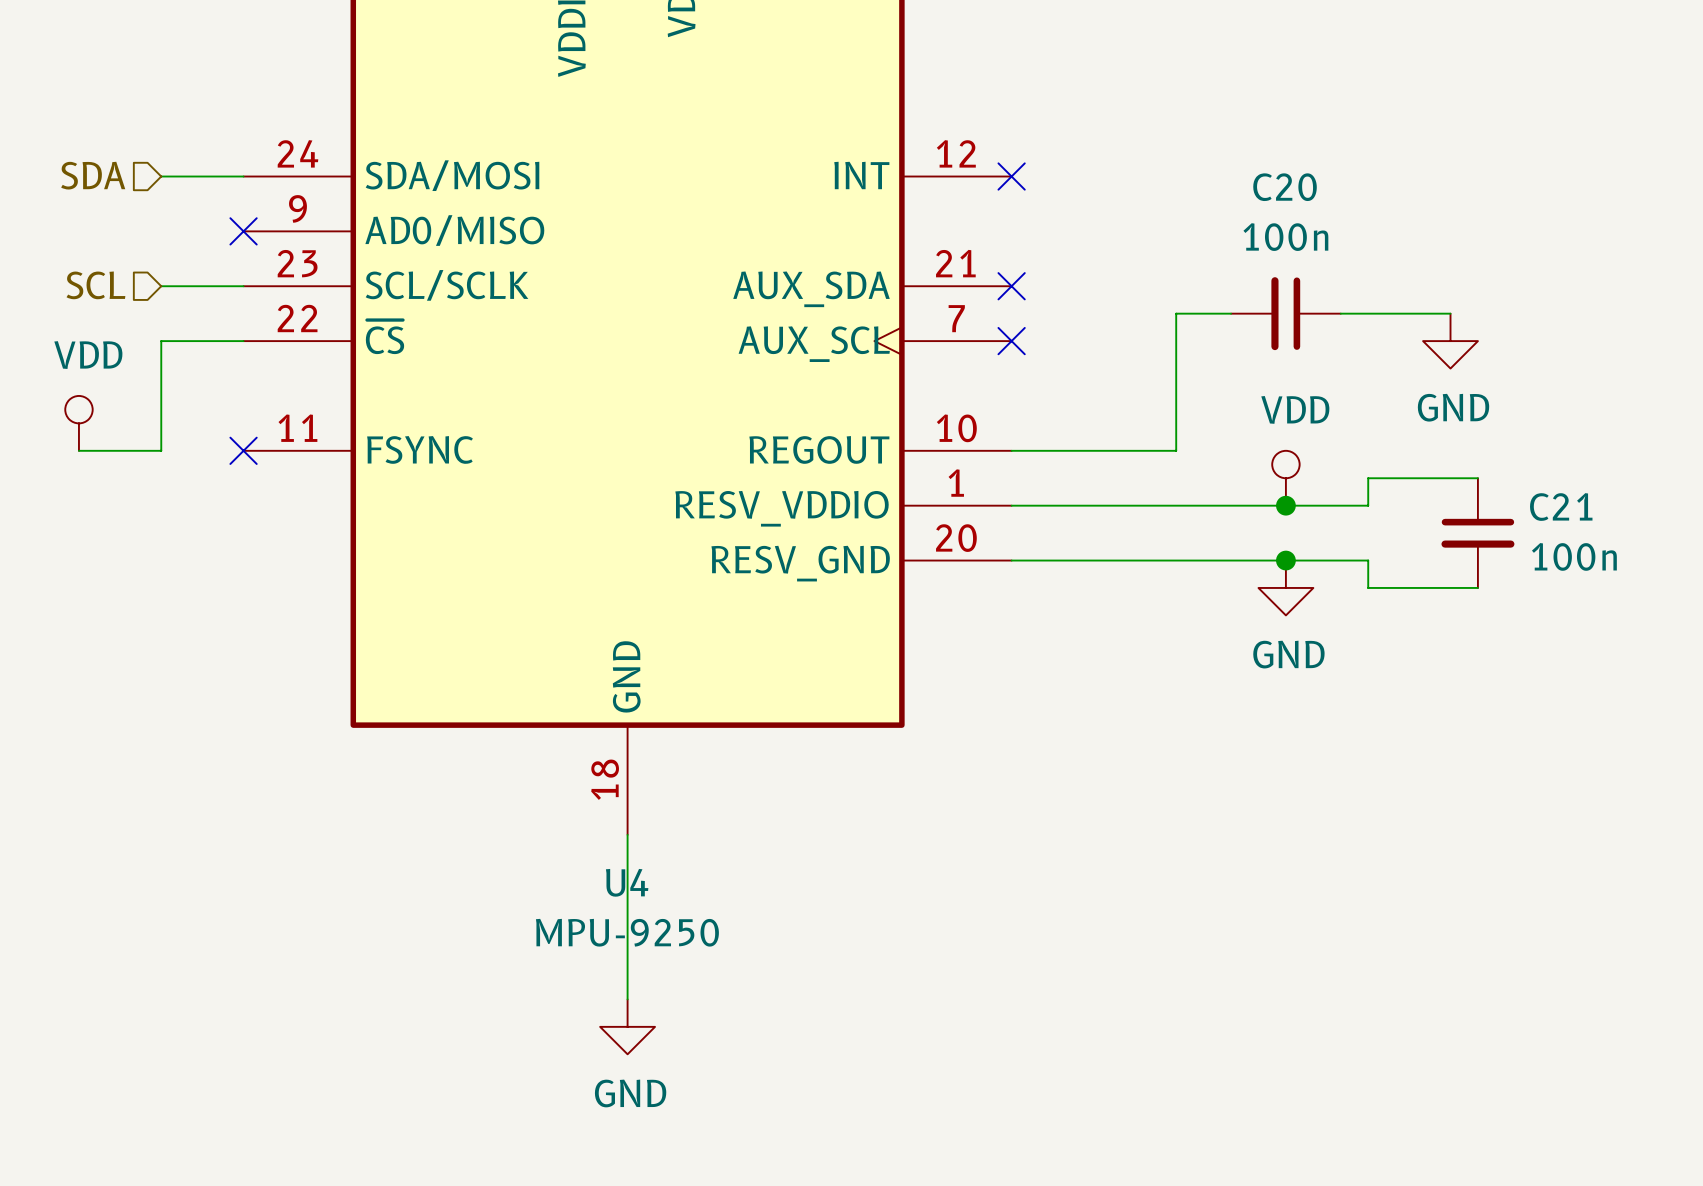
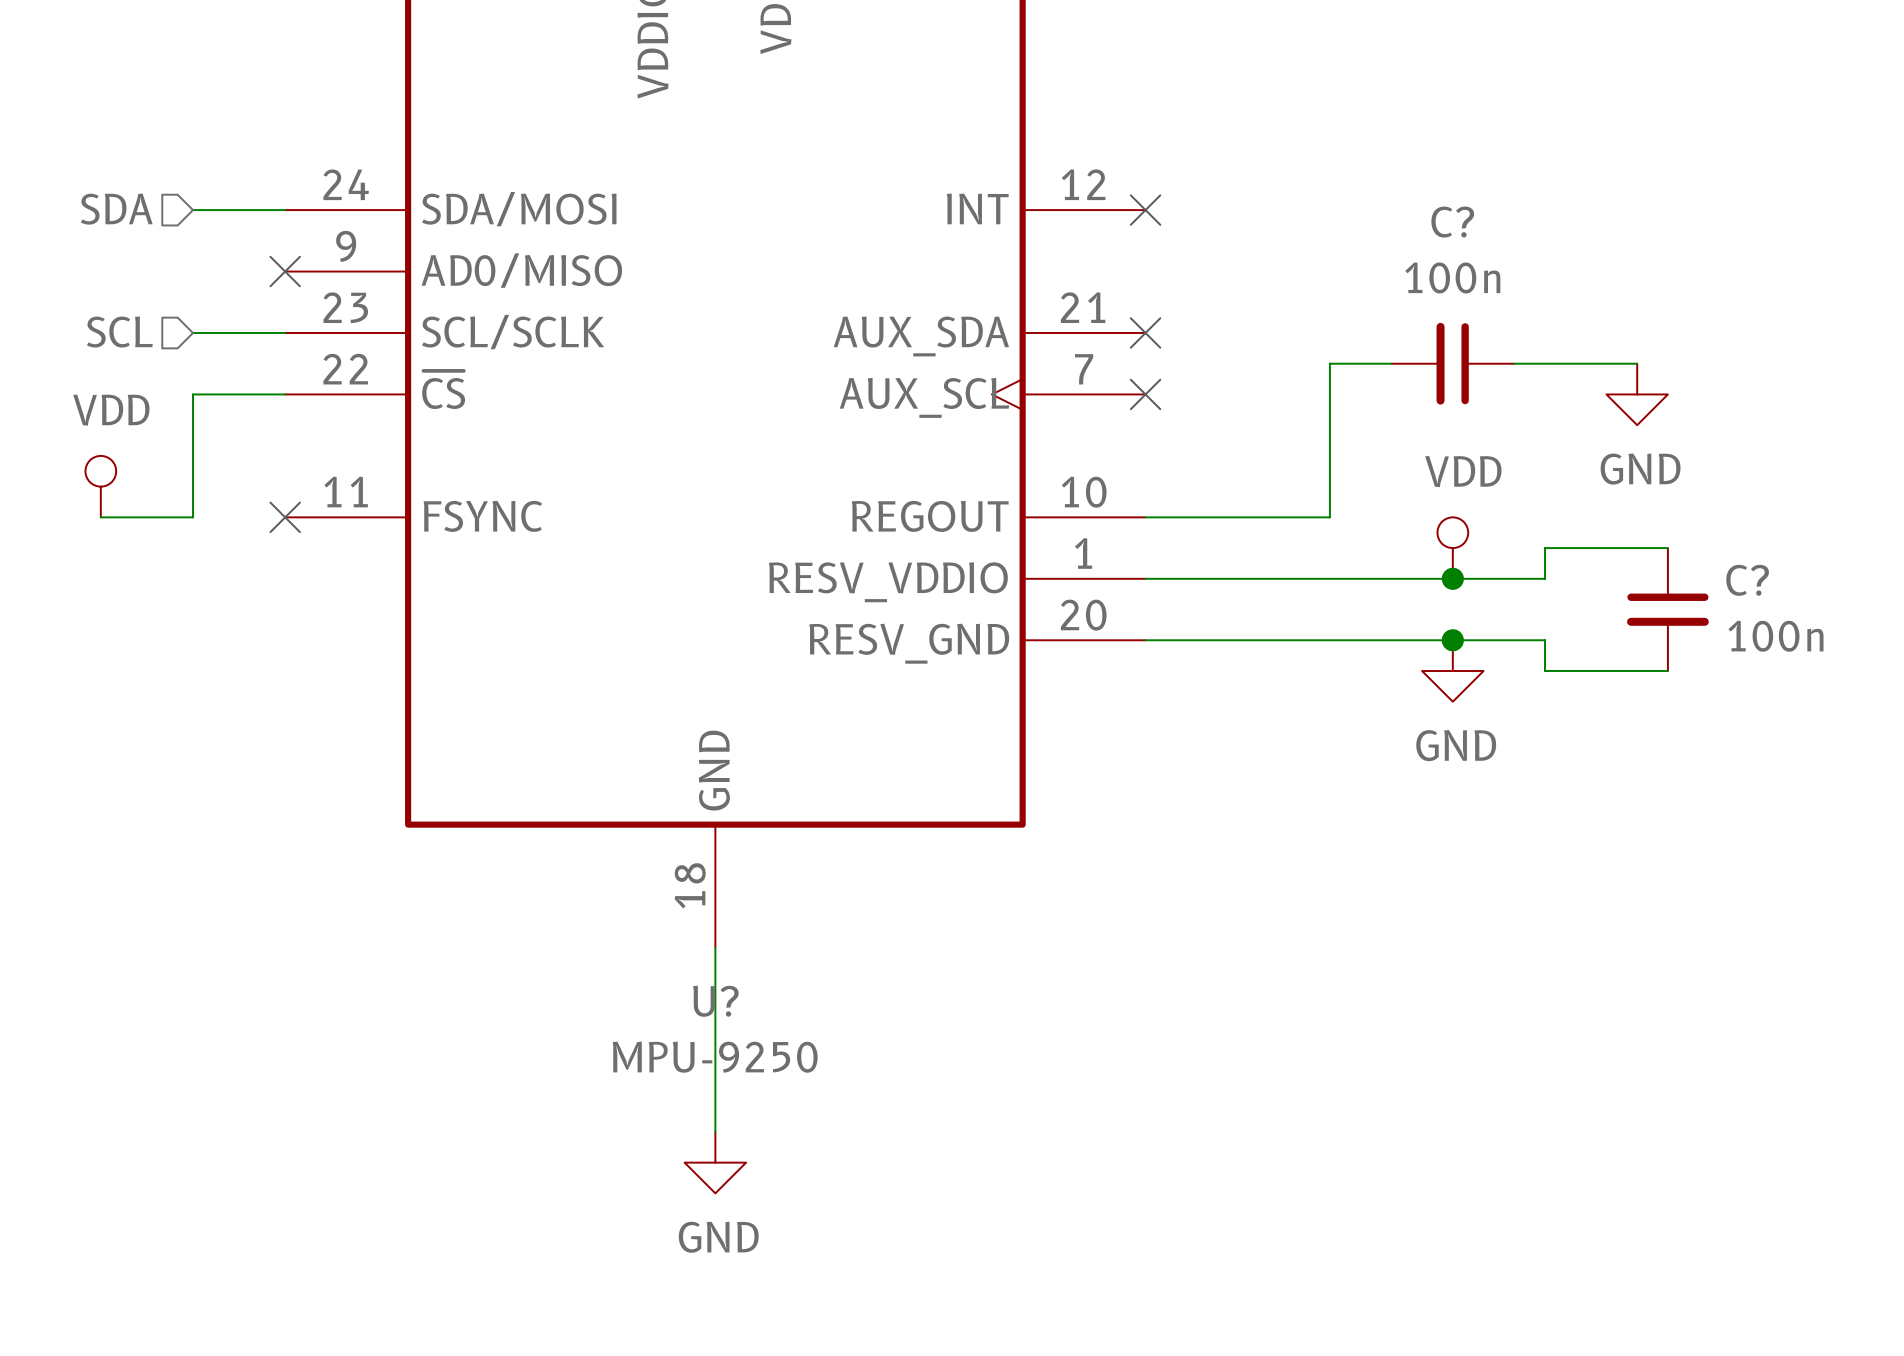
C20 name: C20 (1285, 187) -> C? (1452, 222)
C21 name: C21 (1561, 507) -> C? (1747, 580)
U4 name: U4 (627, 882) -> U? (715, 1001)

